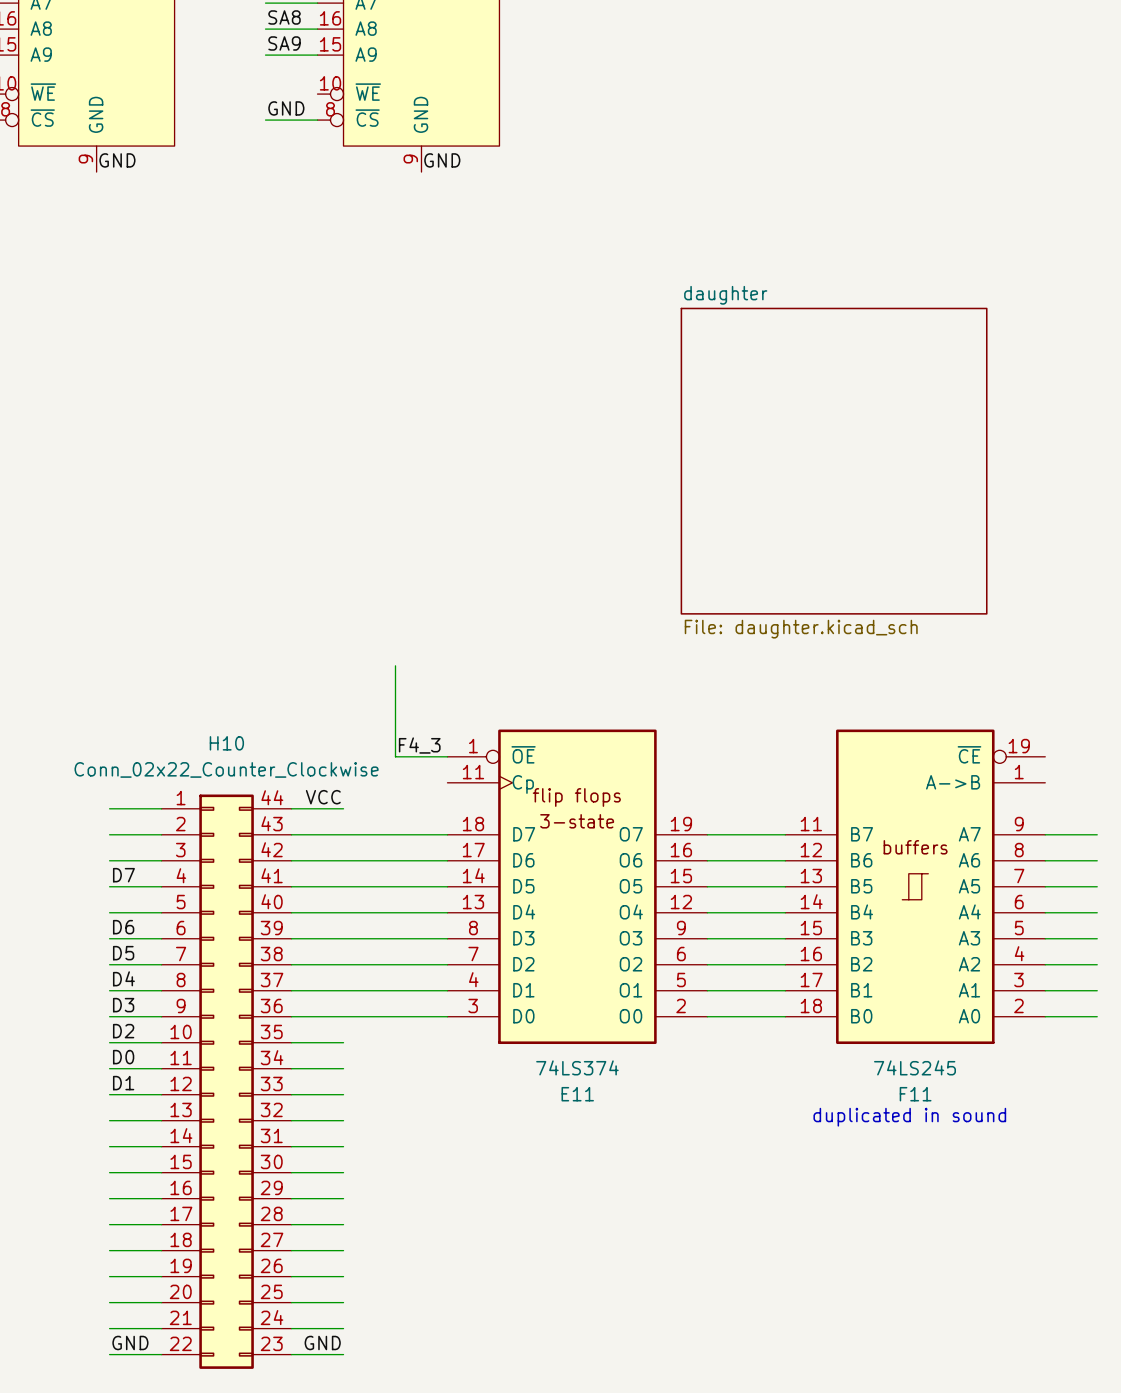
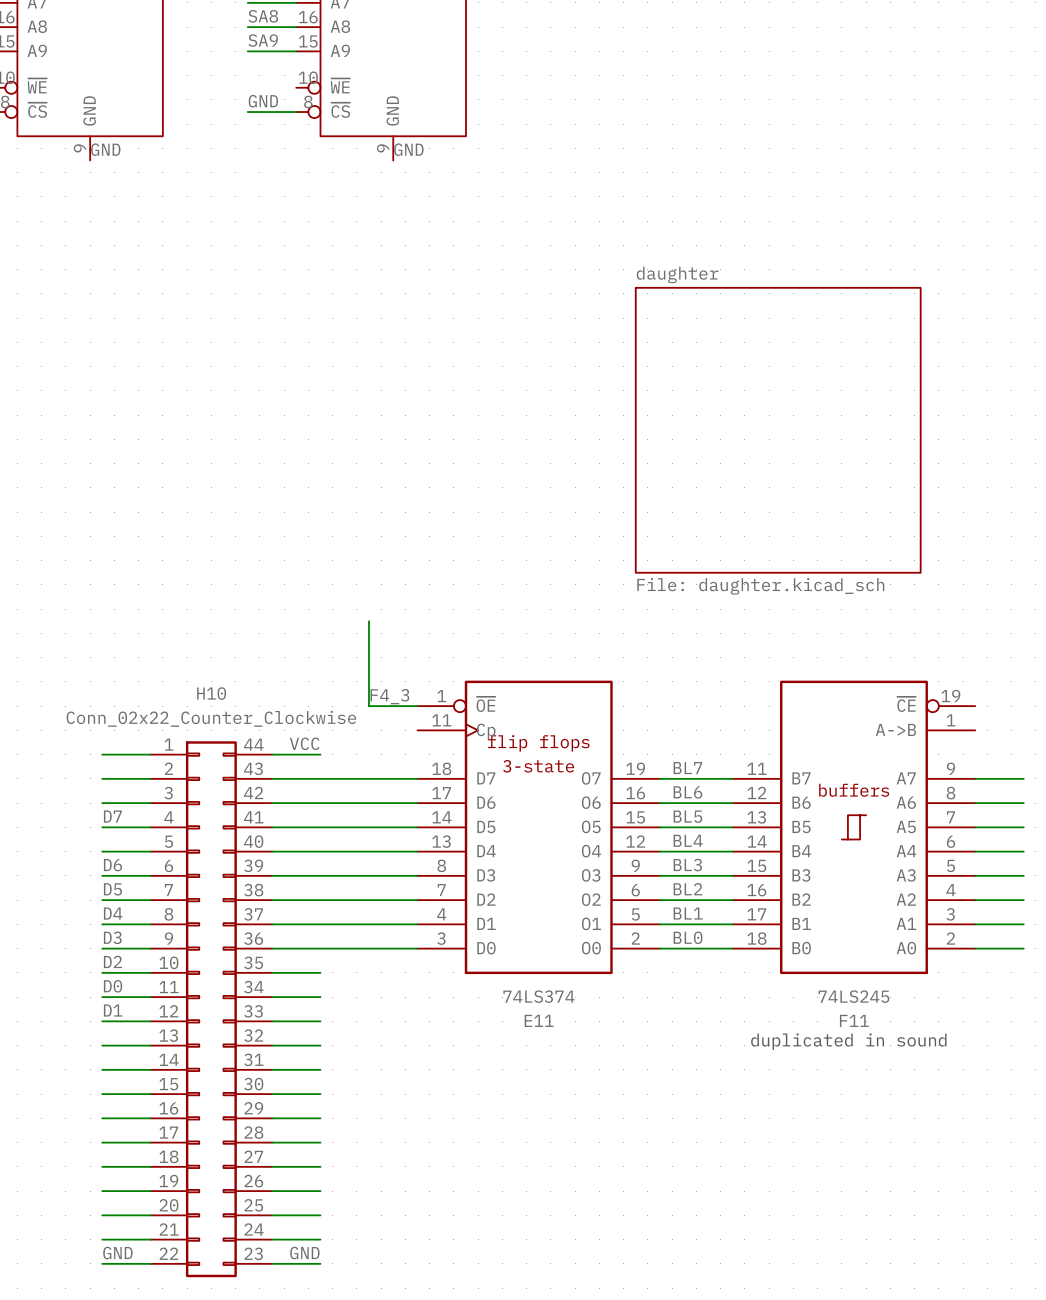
label: none -> BL7 (687, 768)
label: none -> BL6 (687, 792)
label: none -> BL5 (687, 816)
label: none -> BL4 (688, 840)
label: none -> BL3 (687, 865)
label: none -> BL2 (687, 889)
label: none -> BL1 (688, 913)
label: none -> BL0 (688, 937)

